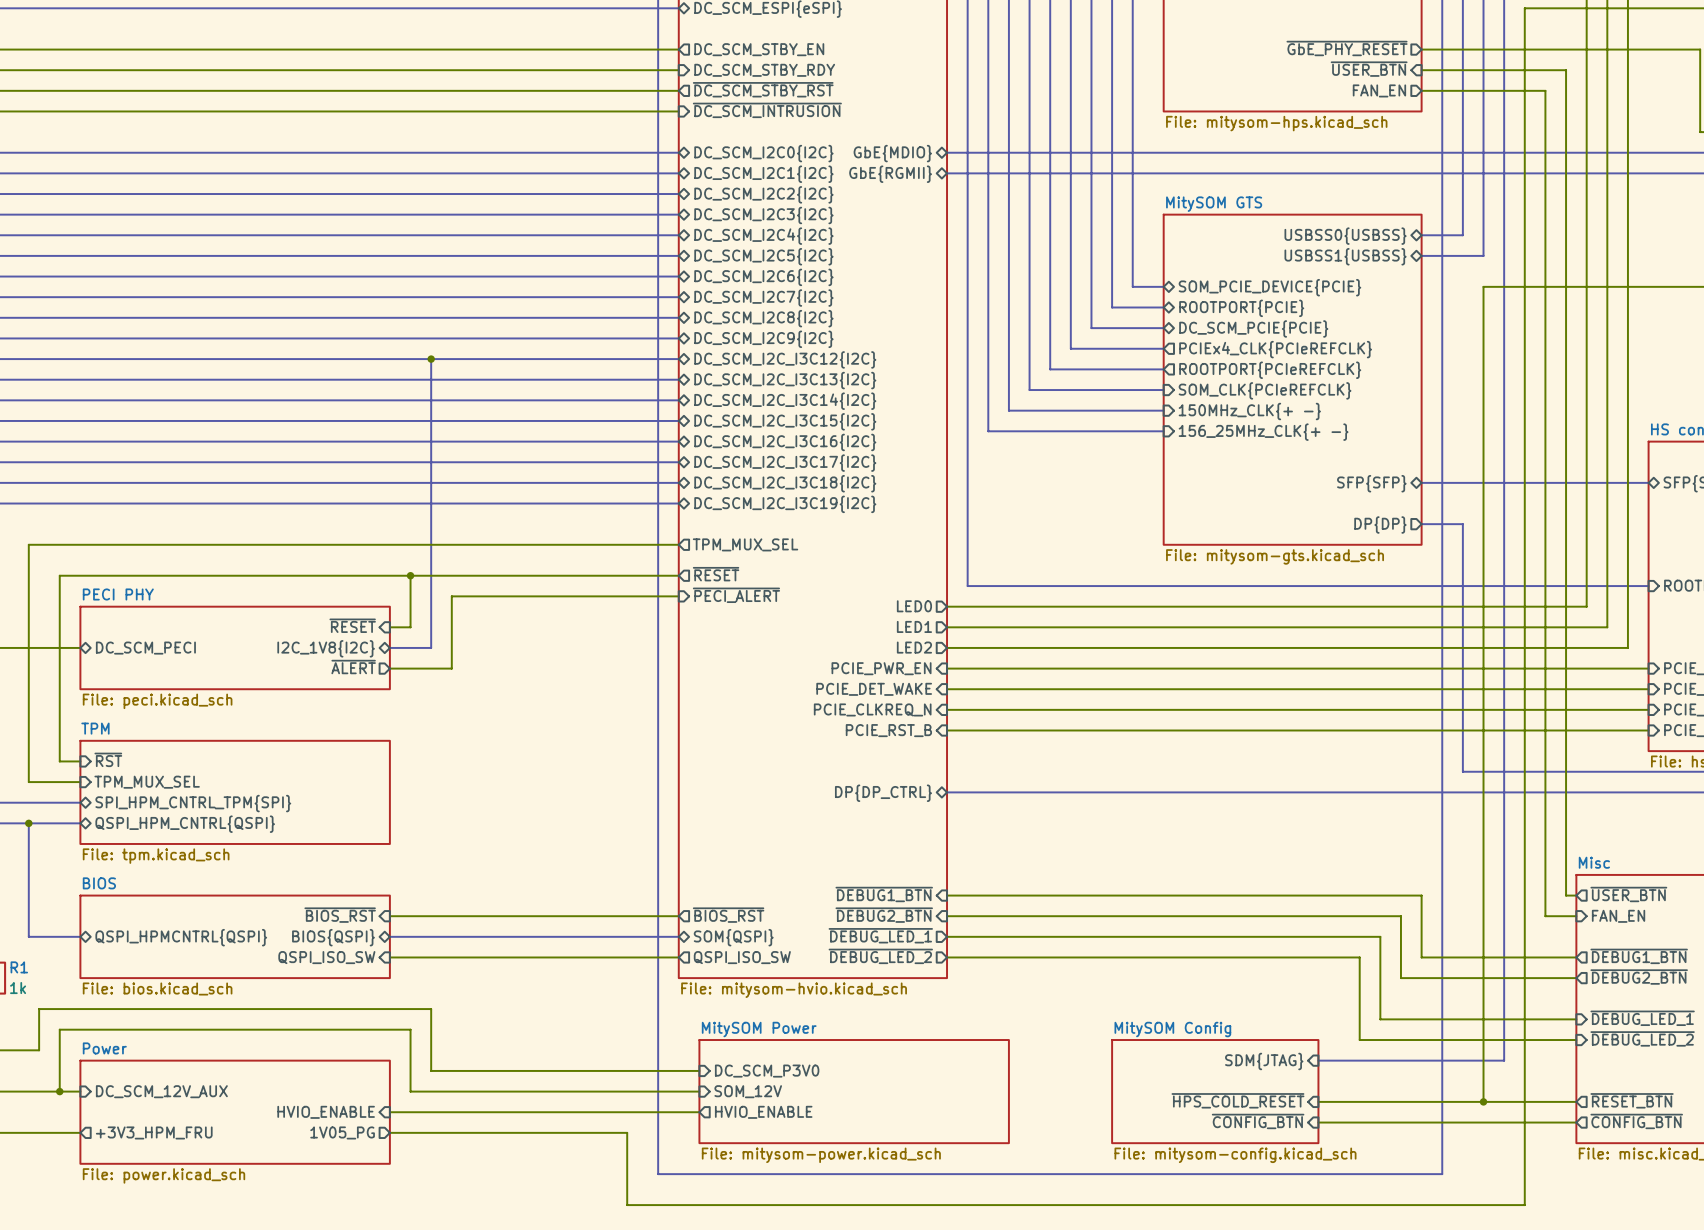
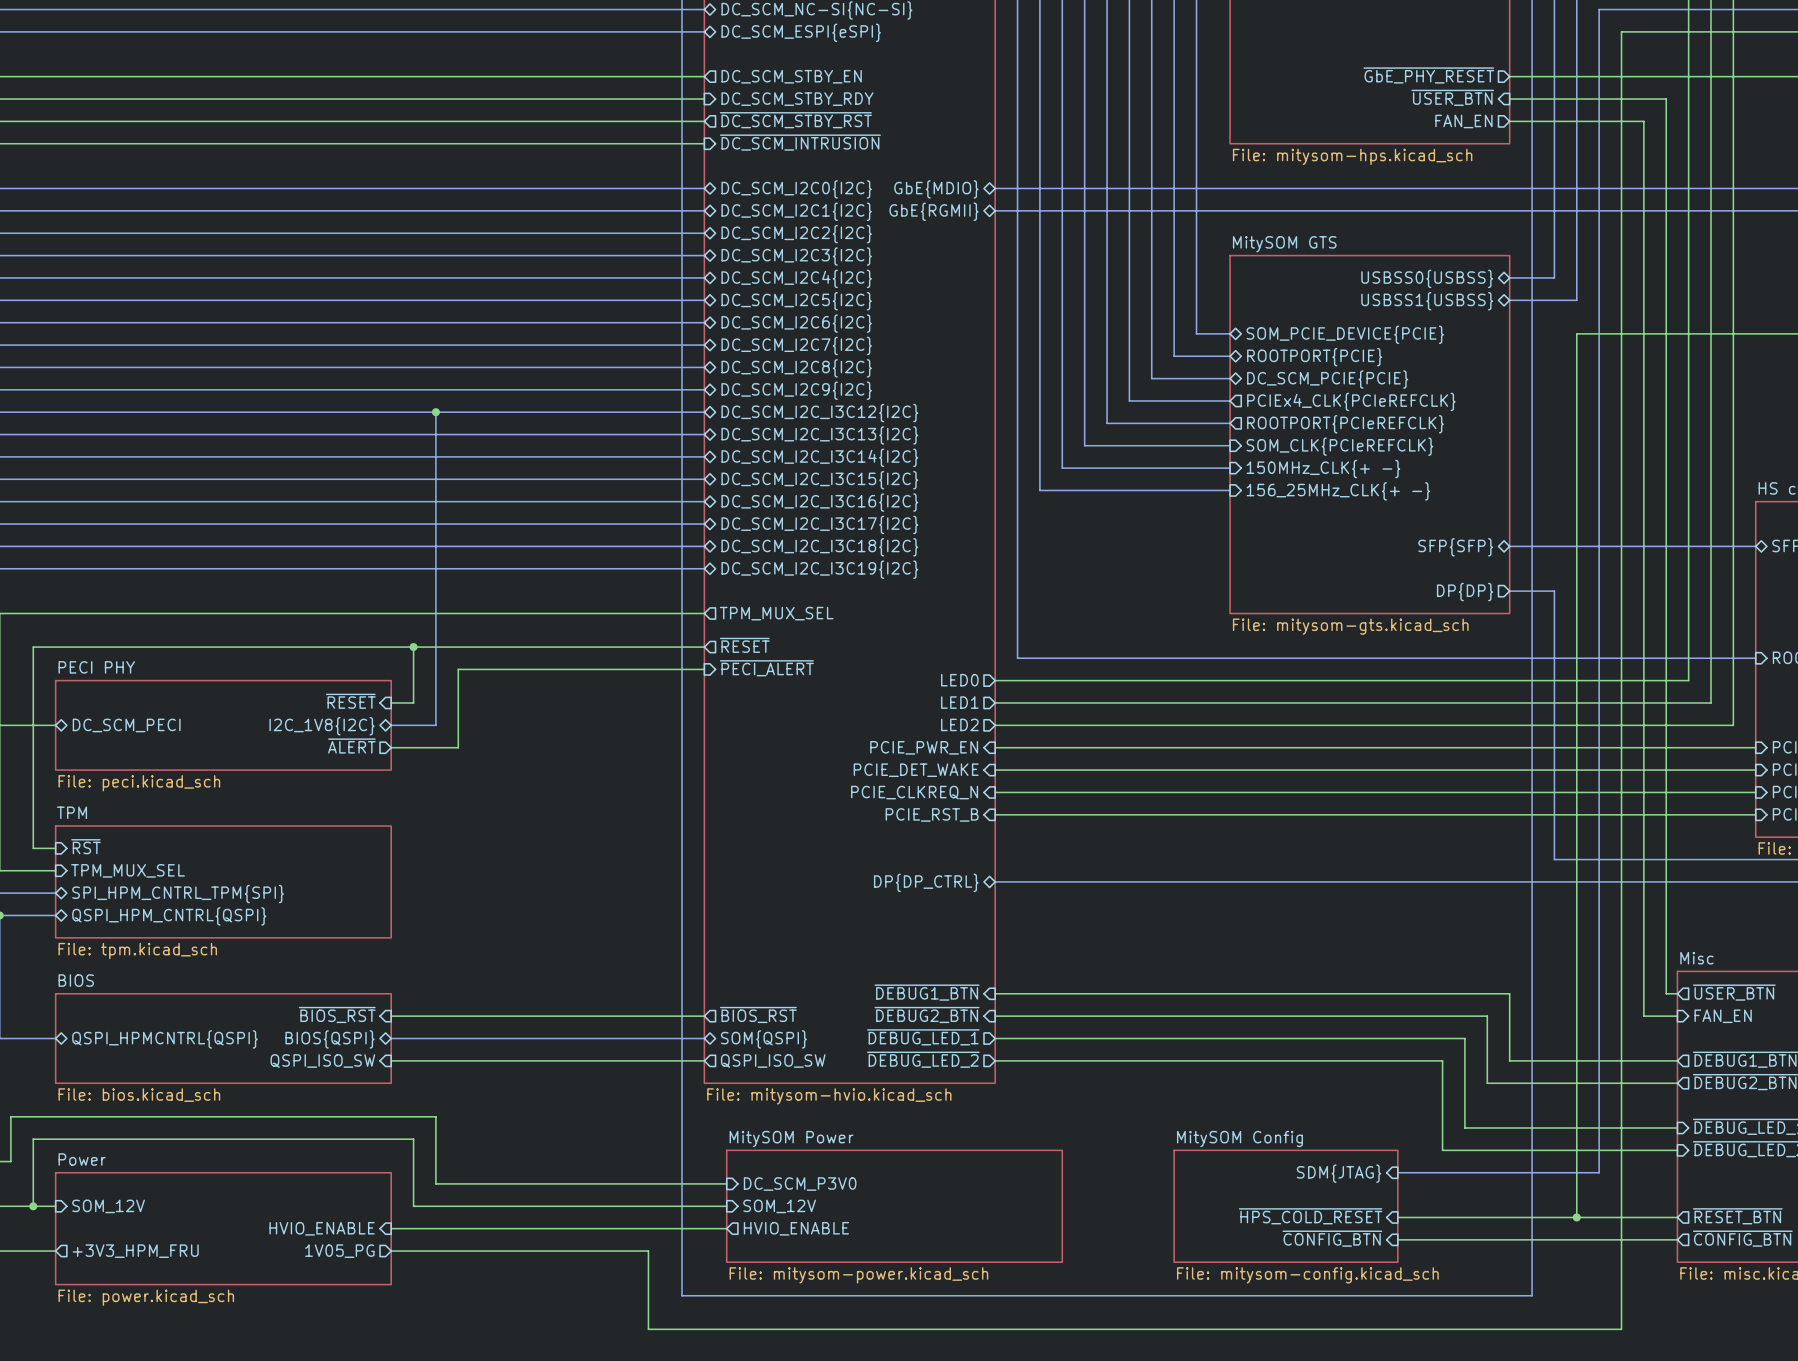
sheet pin: DC_SCM_12V_AUX (161, 1091) -> SOM_12V (108, 1206)

